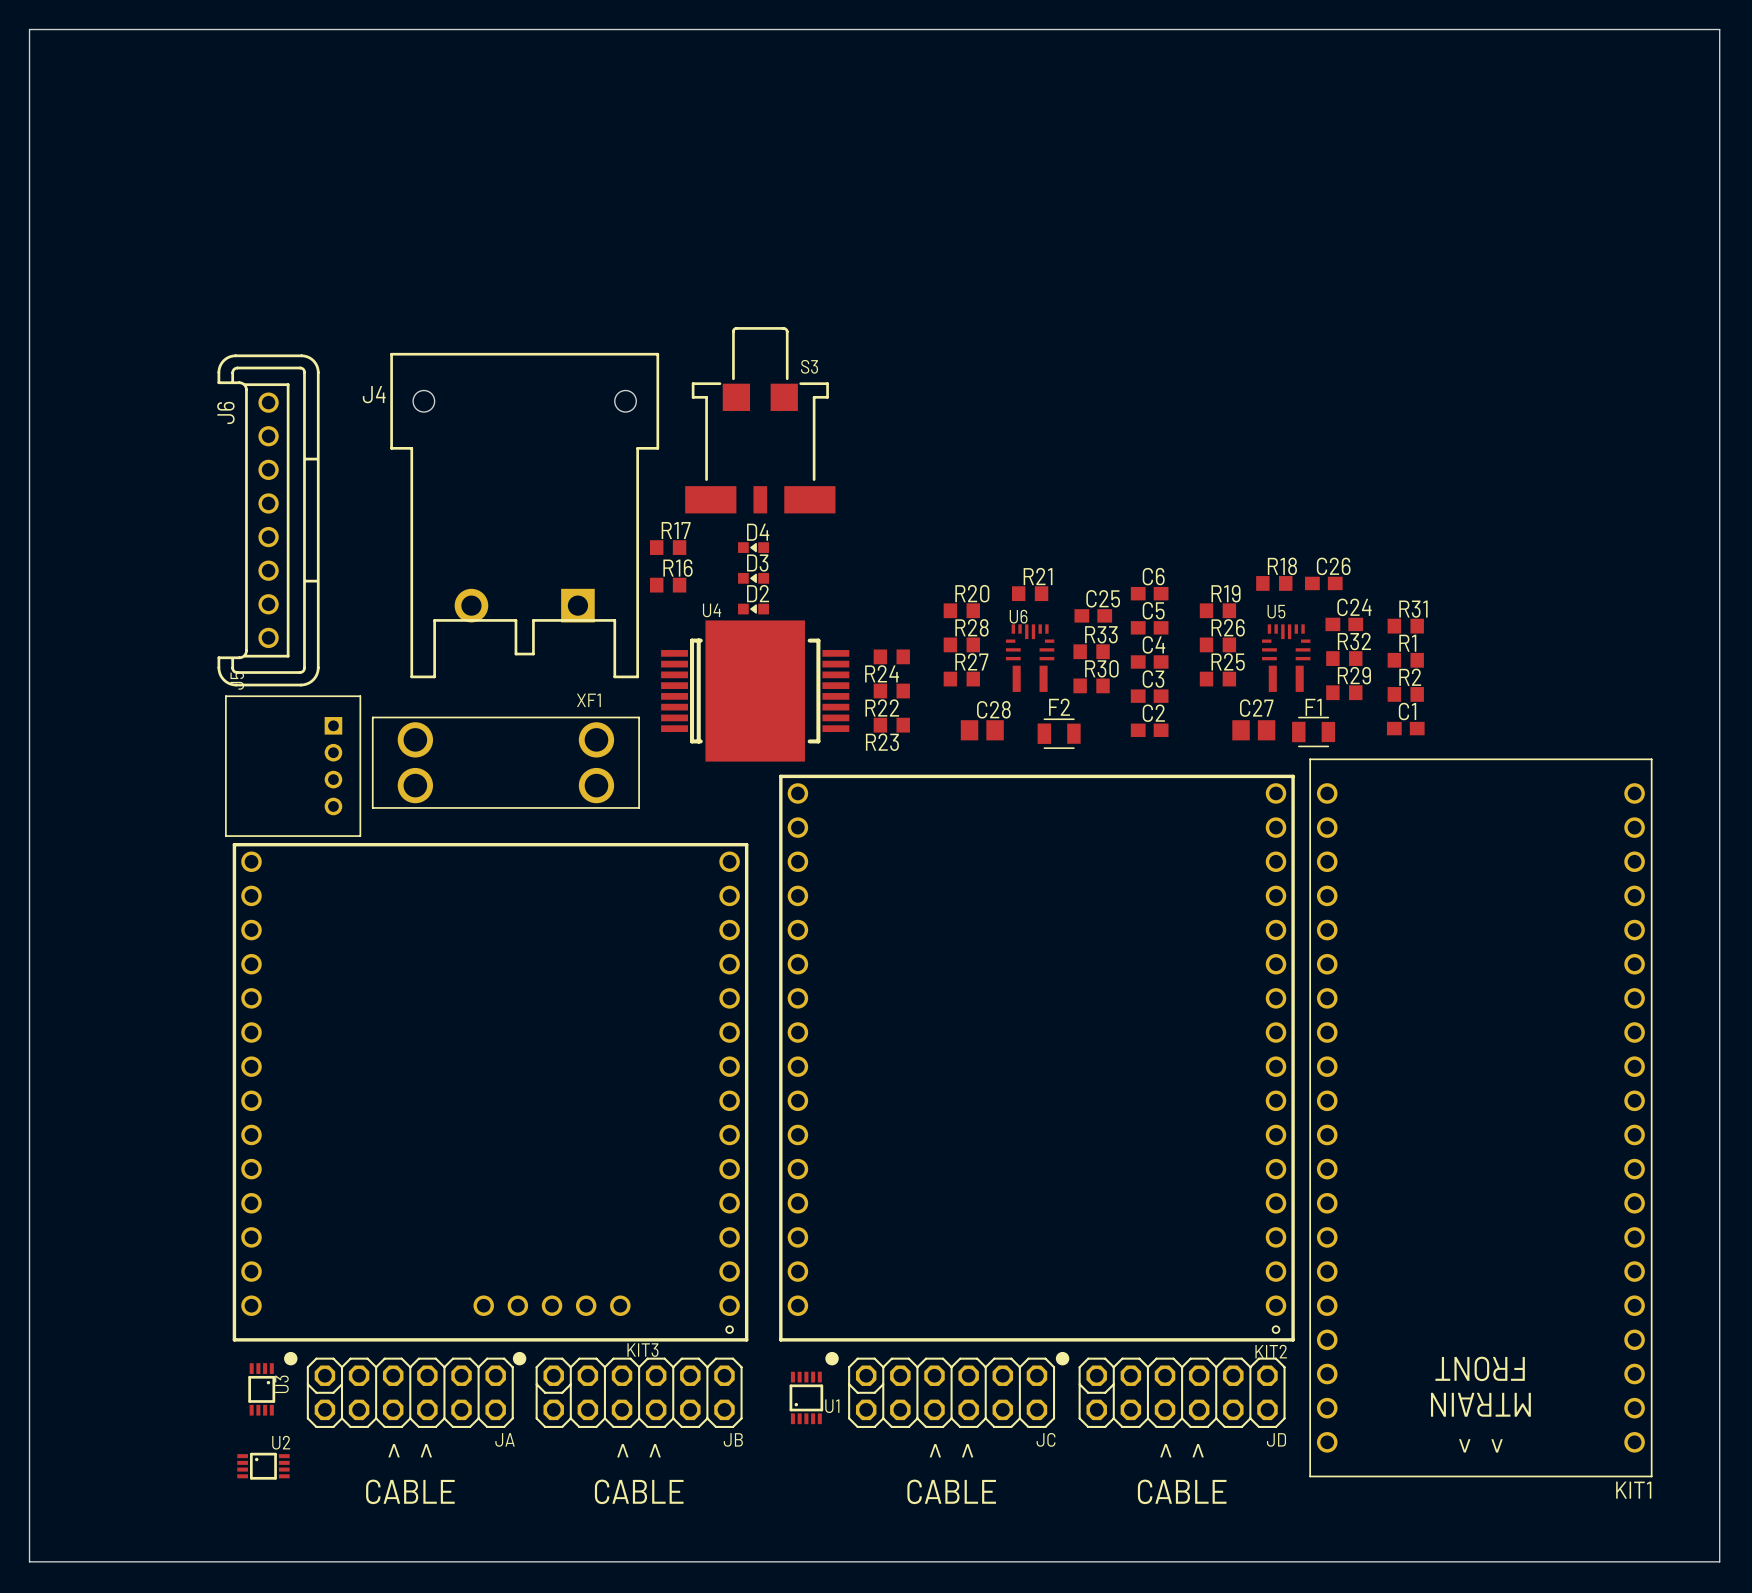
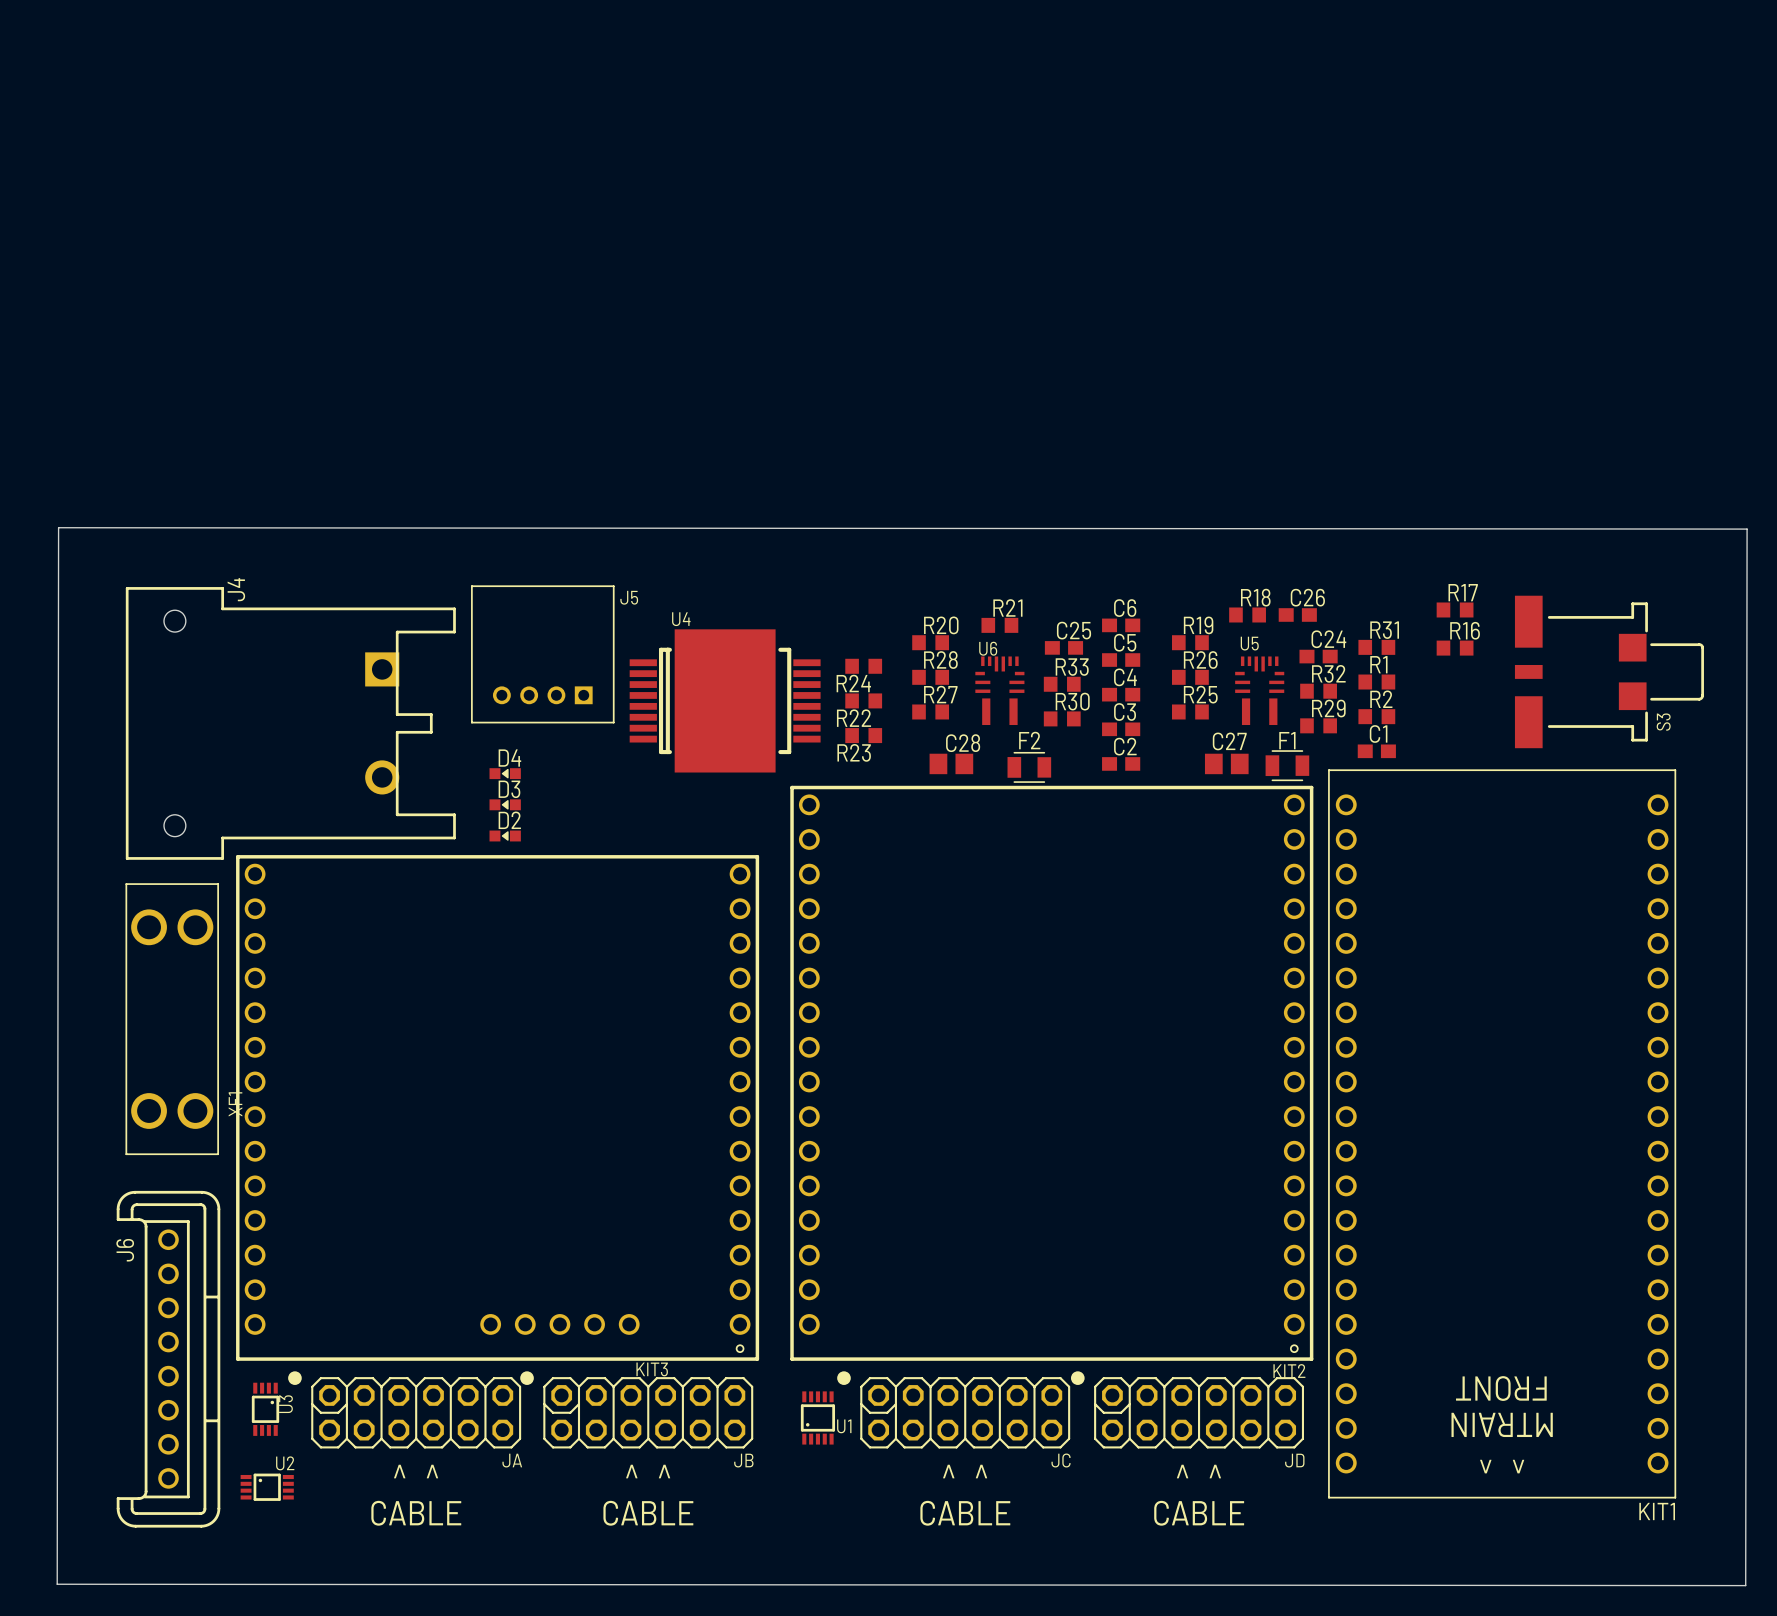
board edge: (29, 29) (1719, 29) (1719, 1561) (29, 1561) (29, 29) -> (58, 527) (57, 1584) (1745, 1585) (1747, 529) (58, 527)
J4 name position: J4 (374, 394) -> J4 (236, 589)
S3 rotation: 0° (760, 420) -> 90° clockwise (1609, 671)
S3 position: (760, 420) -> (1609, 671)
J4 rotation: 0° (524, 515) -> 90° counterclockwise (290, 723)
J4 position: (524, 515) -> (290, 723)
J6 position: (268, 520) -> (168, 1359)
R17 position: (668, 547) -> (1455, 609)
D4 position: (753, 547) -> (505, 773)
D3 position: (753, 578) -> (505, 804)
R18 position: (1274, 583) -> (1247, 614)
C26 position: (1323, 583) -> (1297, 614)
R16 position: (668, 585) -> (1455, 648)
R21 position: (1030, 593) -> (999, 625)
C6 position: (1149, 593) -> (1121, 625)
D2 position: (753, 609) -> (505, 835)
R20 position: (961, 610) -> (930, 642)
R19 position: (1217, 610) -> (1190, 642)
C25 position: (1093, 615) -> (1063, 647)
C24 position: (1344, 624) -> (1318, 656)
R31 position: (1405, 626) -> (1376, 647)
C5 position: (1149, 627) -> (1121, 660)
R28 position: (961, 644) -> (930, 677)
R26 position: (1217, 644) -> (1190, 677)
R33 position: (1091, 651) -> (1062, 684)
R24 position: (891, 656) -> (863, 666)
U6 position: (1030, 658) -> (999, 690)
U5 position: (1286, 658) -> (1259, 690)
R32 position: (1344, 658) -> (1318, 691)
R1 position: (1405, 660) -> (1376, 682)
C4 position: (1149, 661) -> (1121, 694)
R27 position: (961, 679) -> (930, 711)
R25 position: (1217, 679) -> (1190, 711)
R30 position: (1091, 685) -> (1062, 718)
U4 position: (755, 691) -> (725, 700)
R22 position: (891, 691) -> (863, 700)
R29 position: (1344, 692) -> (1318, 725)
R2 position: (1405, 694) -> (1376, 716)
C3 position: (1149, 696) -> (1121, 729)
R23 position: (891, 725) -> (863, 735)
C1 position: (1405, 728) -> (1376, 751)
C28 position: (982, 730) -> (951, 763)
C2 position: (1149, 730) -> (1121, 763)
C27 position: (1253, 730) -> (1226, 763)
F1 position: (1313, 731) -> (1287, 765)
F2 position: (1059, 733) -> (1029, 767)
XF1 rotation: 0° (505, 762) -> 90° clockwise (172, 1019)
XF1 position: (505, 762) -> (172, 1019)
J5 rotation: 0° (293, 766) -> 90° clockwise (542, 654)
J5 position: (293, 766) -> (542, 654)

